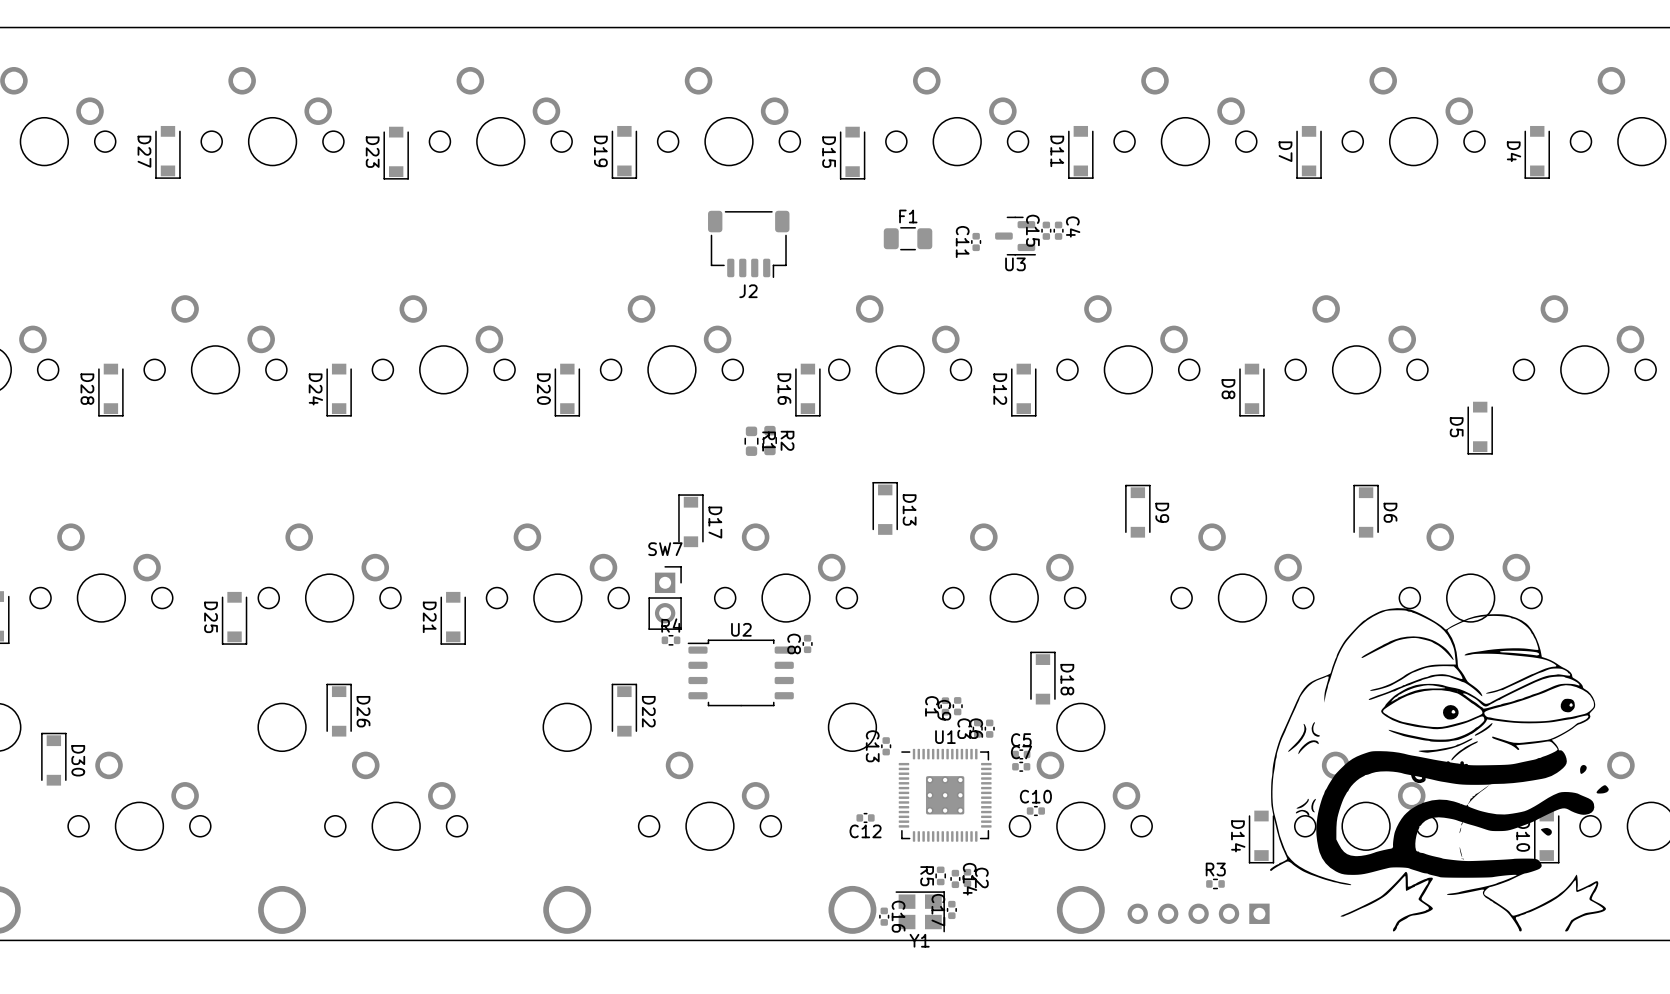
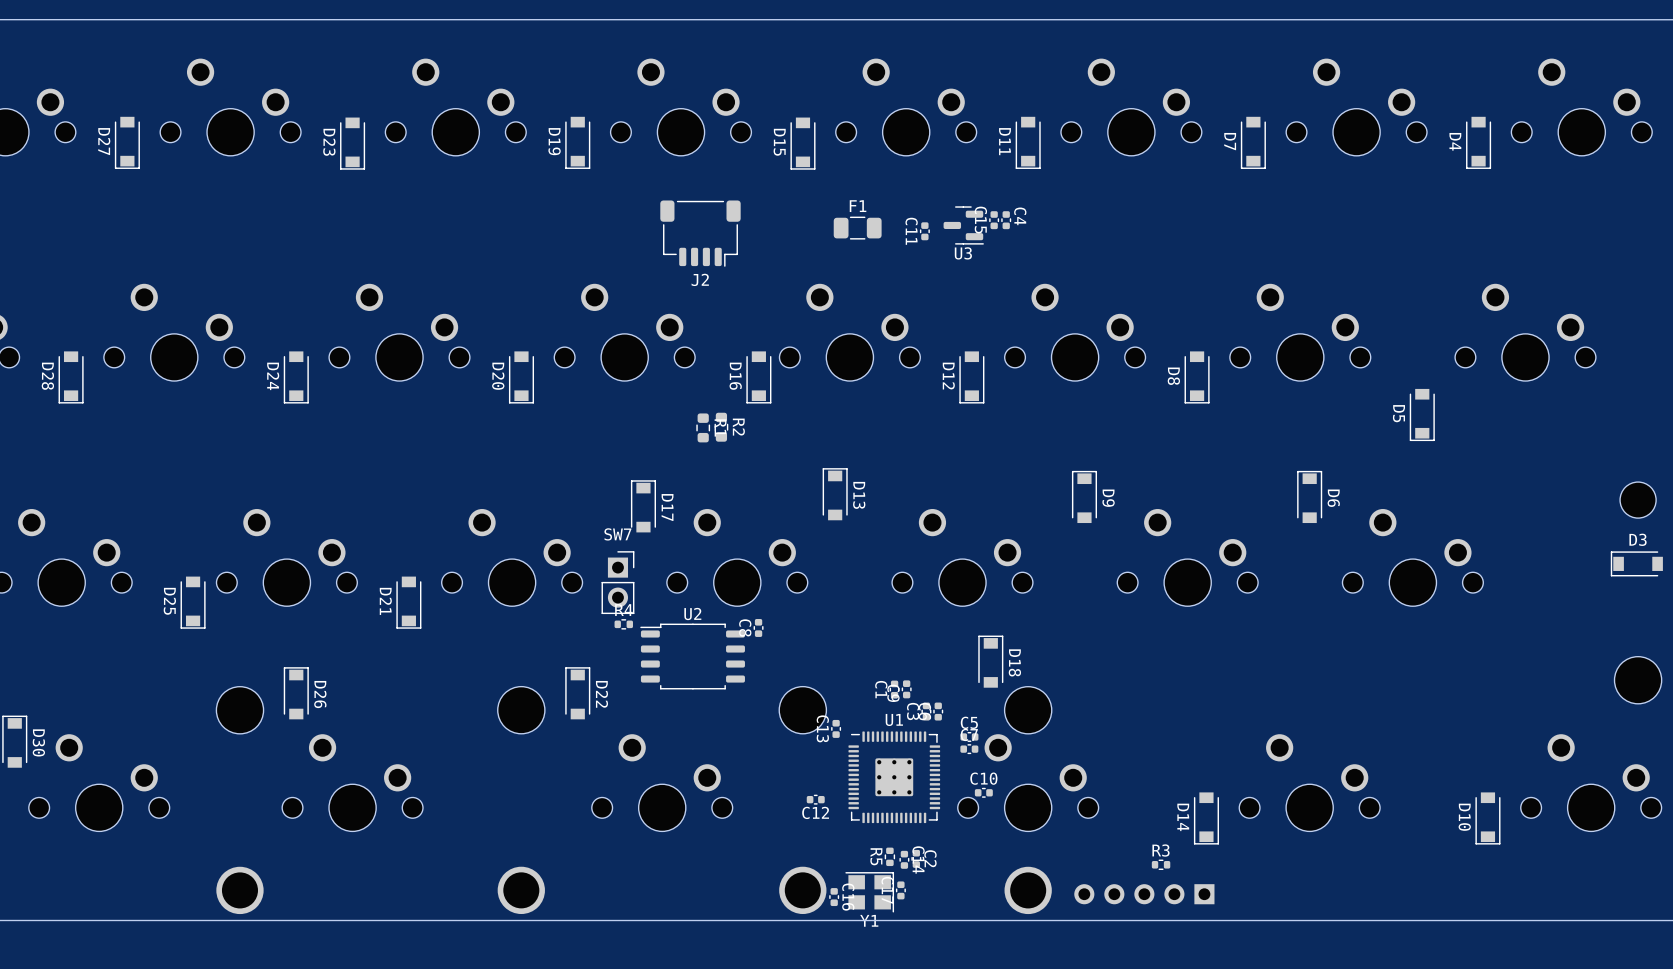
part: (1439, 769) -> none

